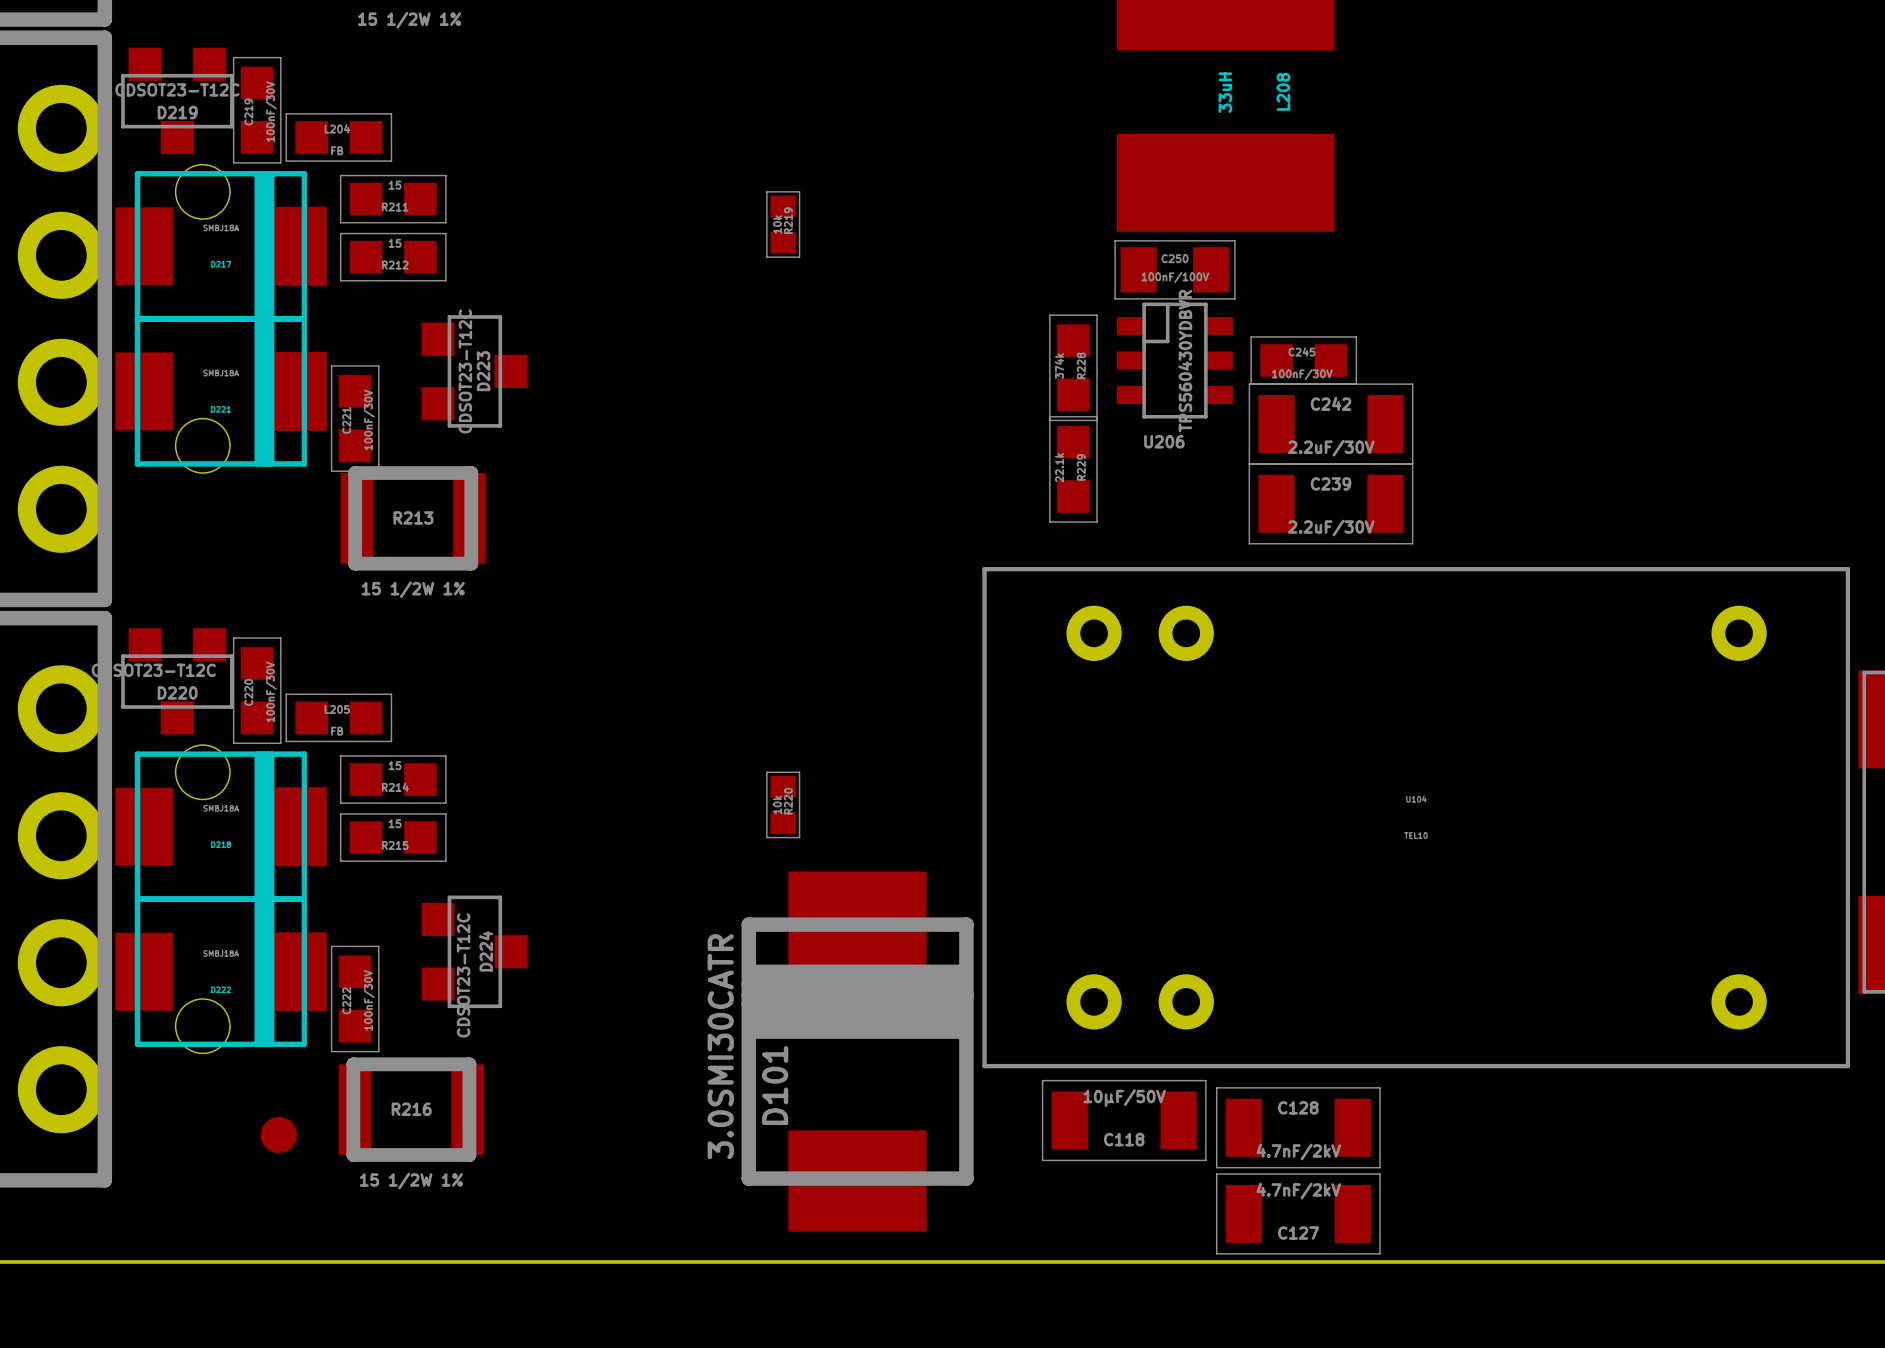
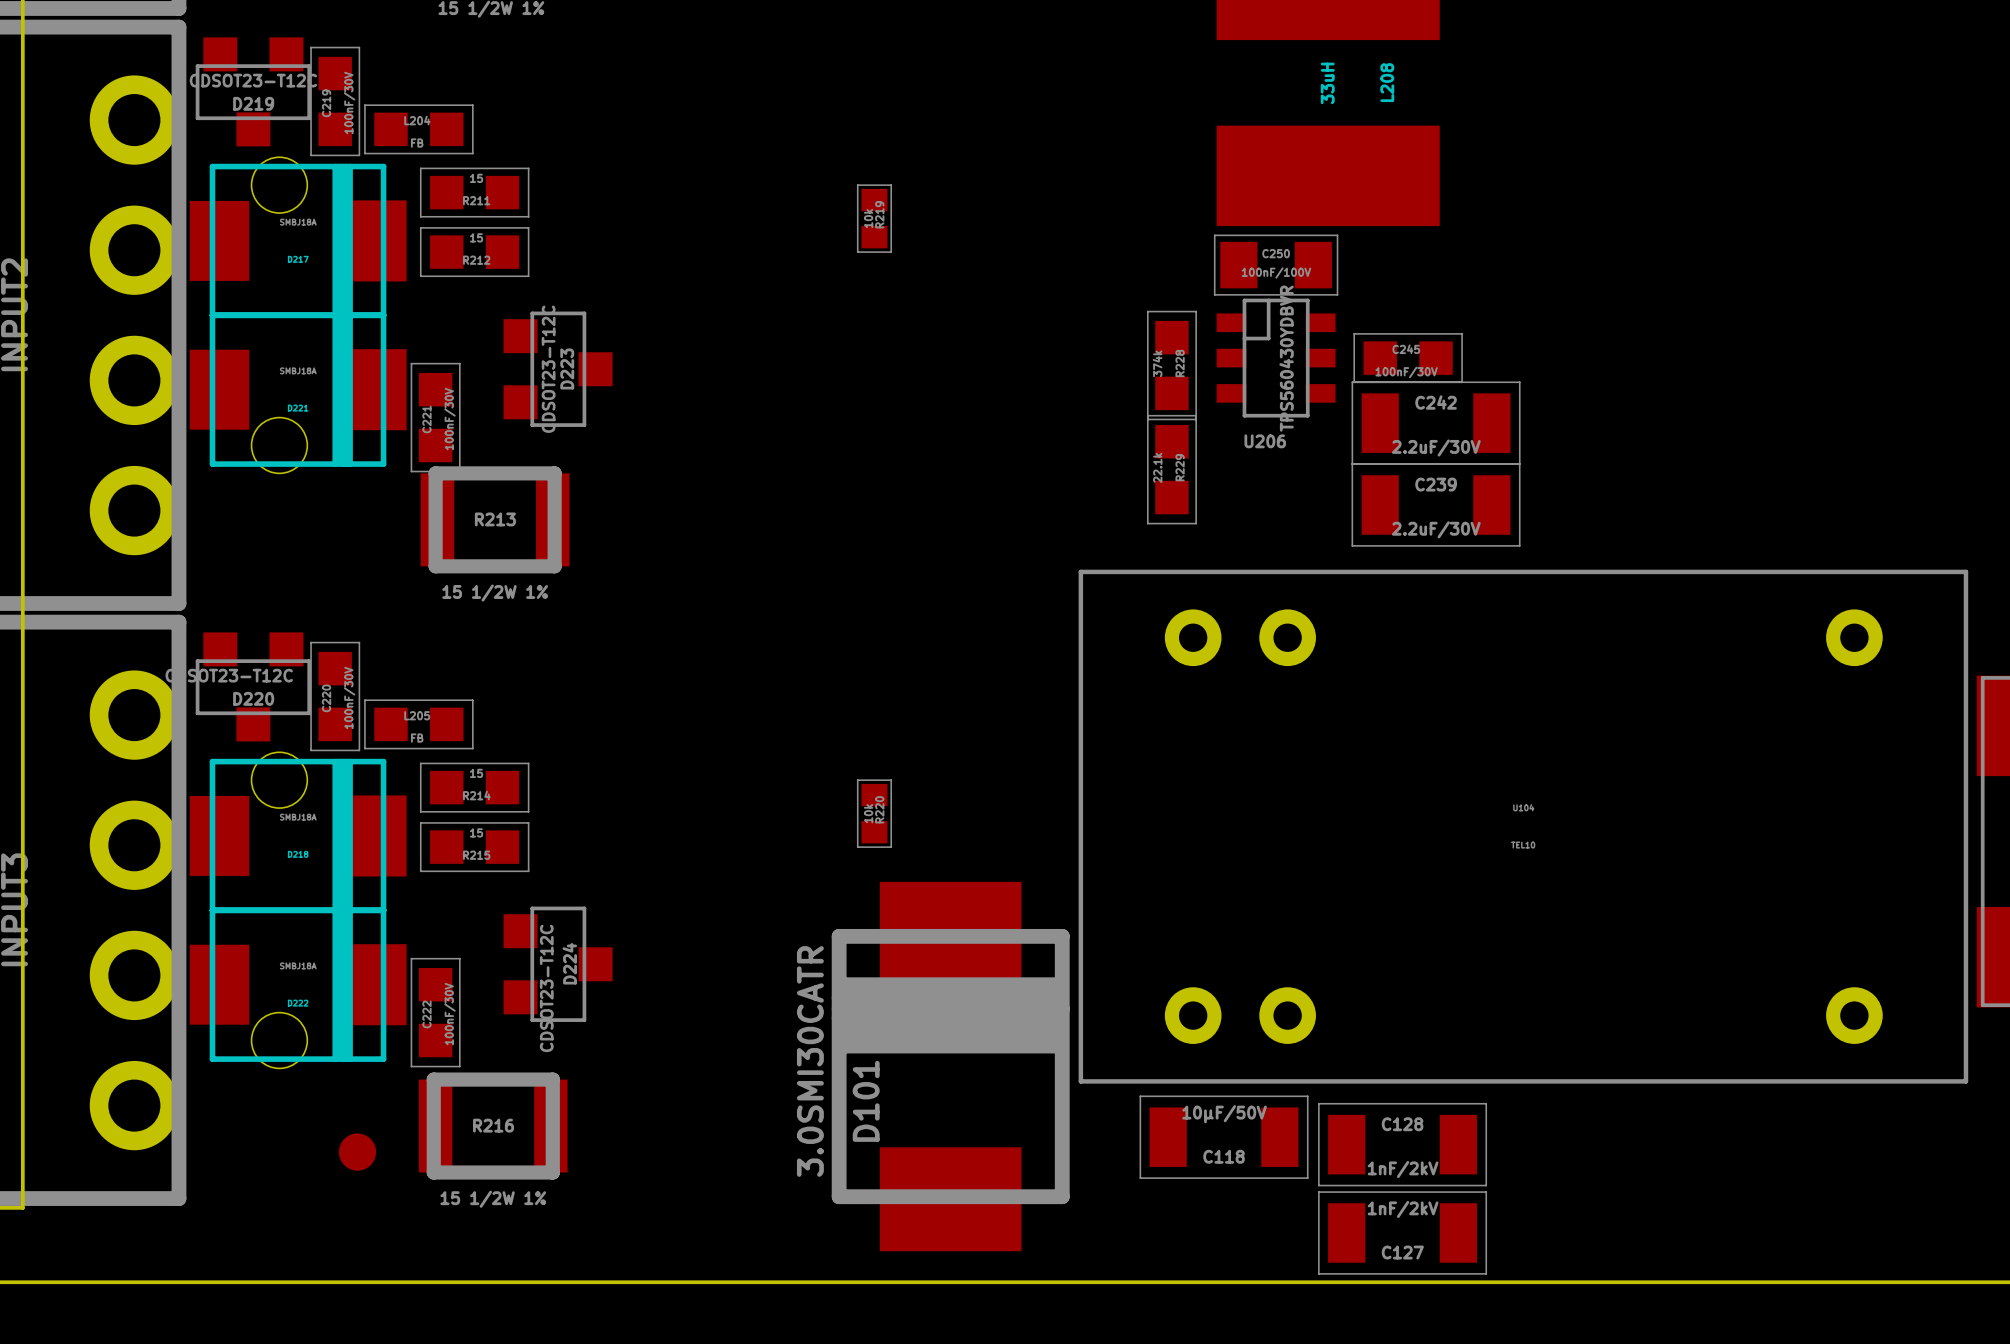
C128 value: 4.7nF/2kV (1298, 1151) -> 1nF/2kV (1403, 1169)
C127 value: 4.7nF/2kV (1298, 1190) -> 1nF/2kV (1403, 1209)

